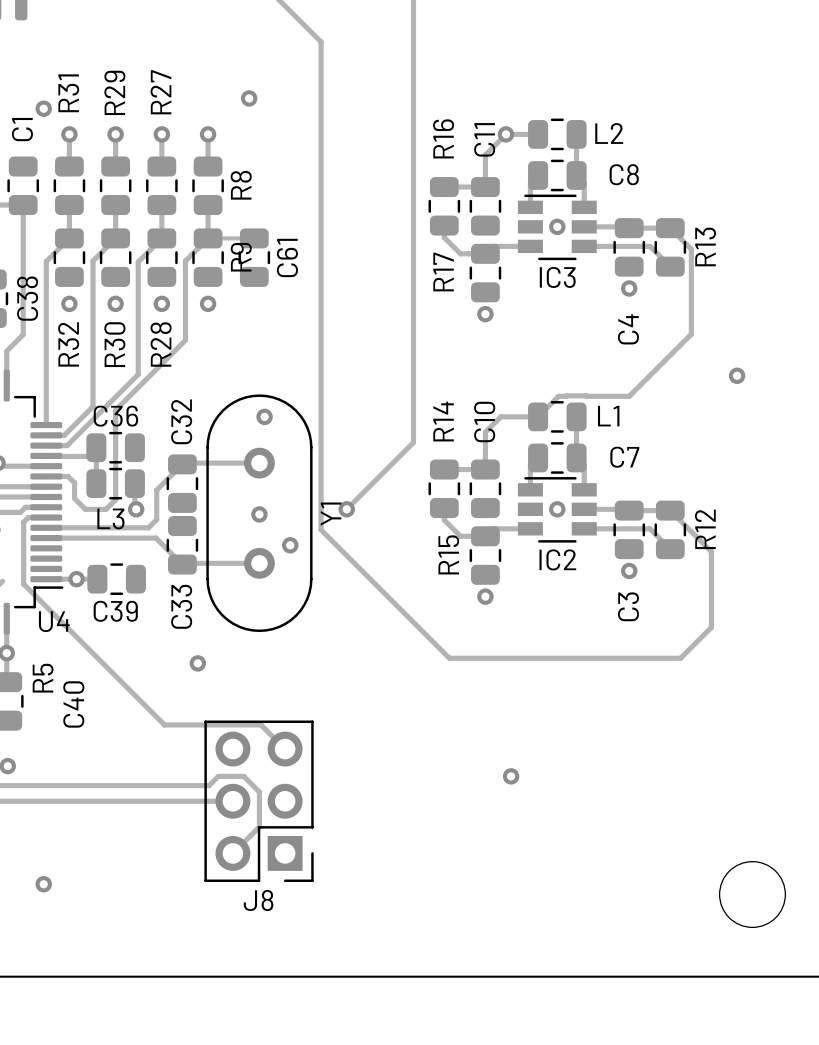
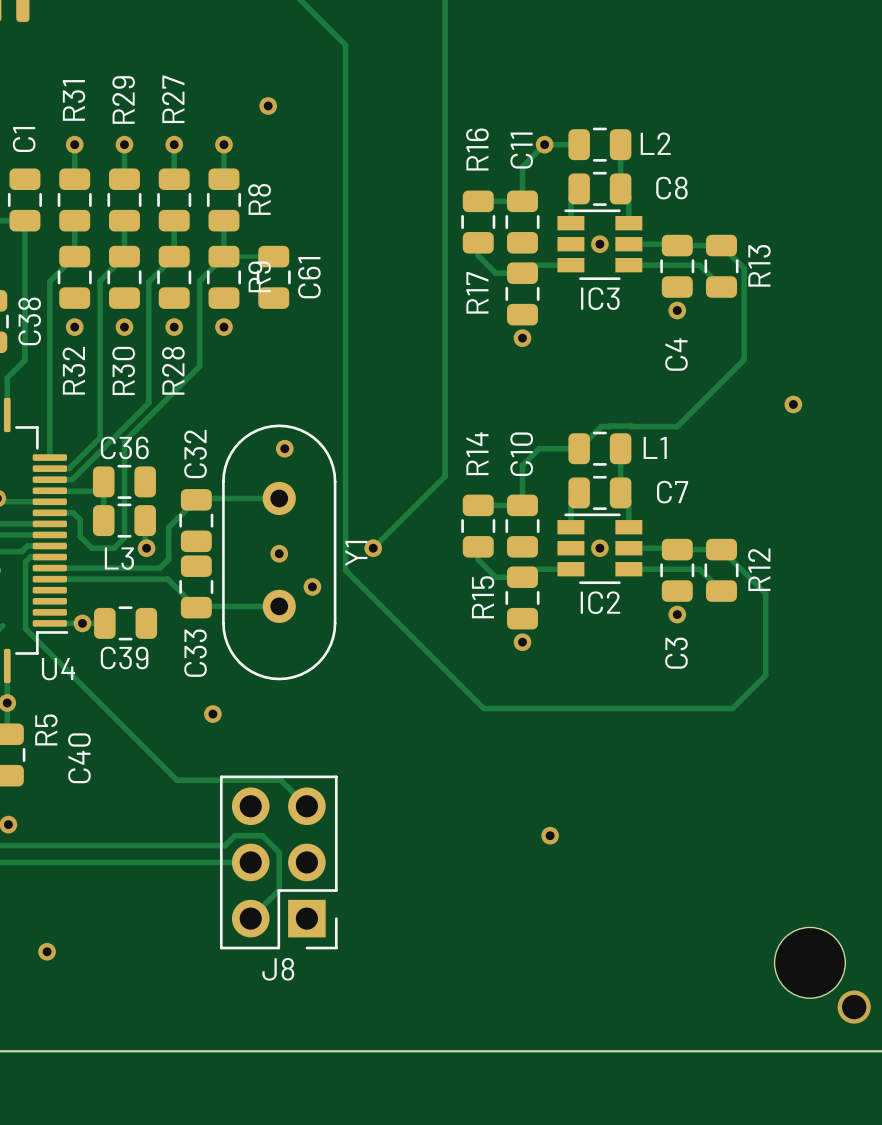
via: (43, 108) -> none
via: none -> (854, 1007)

